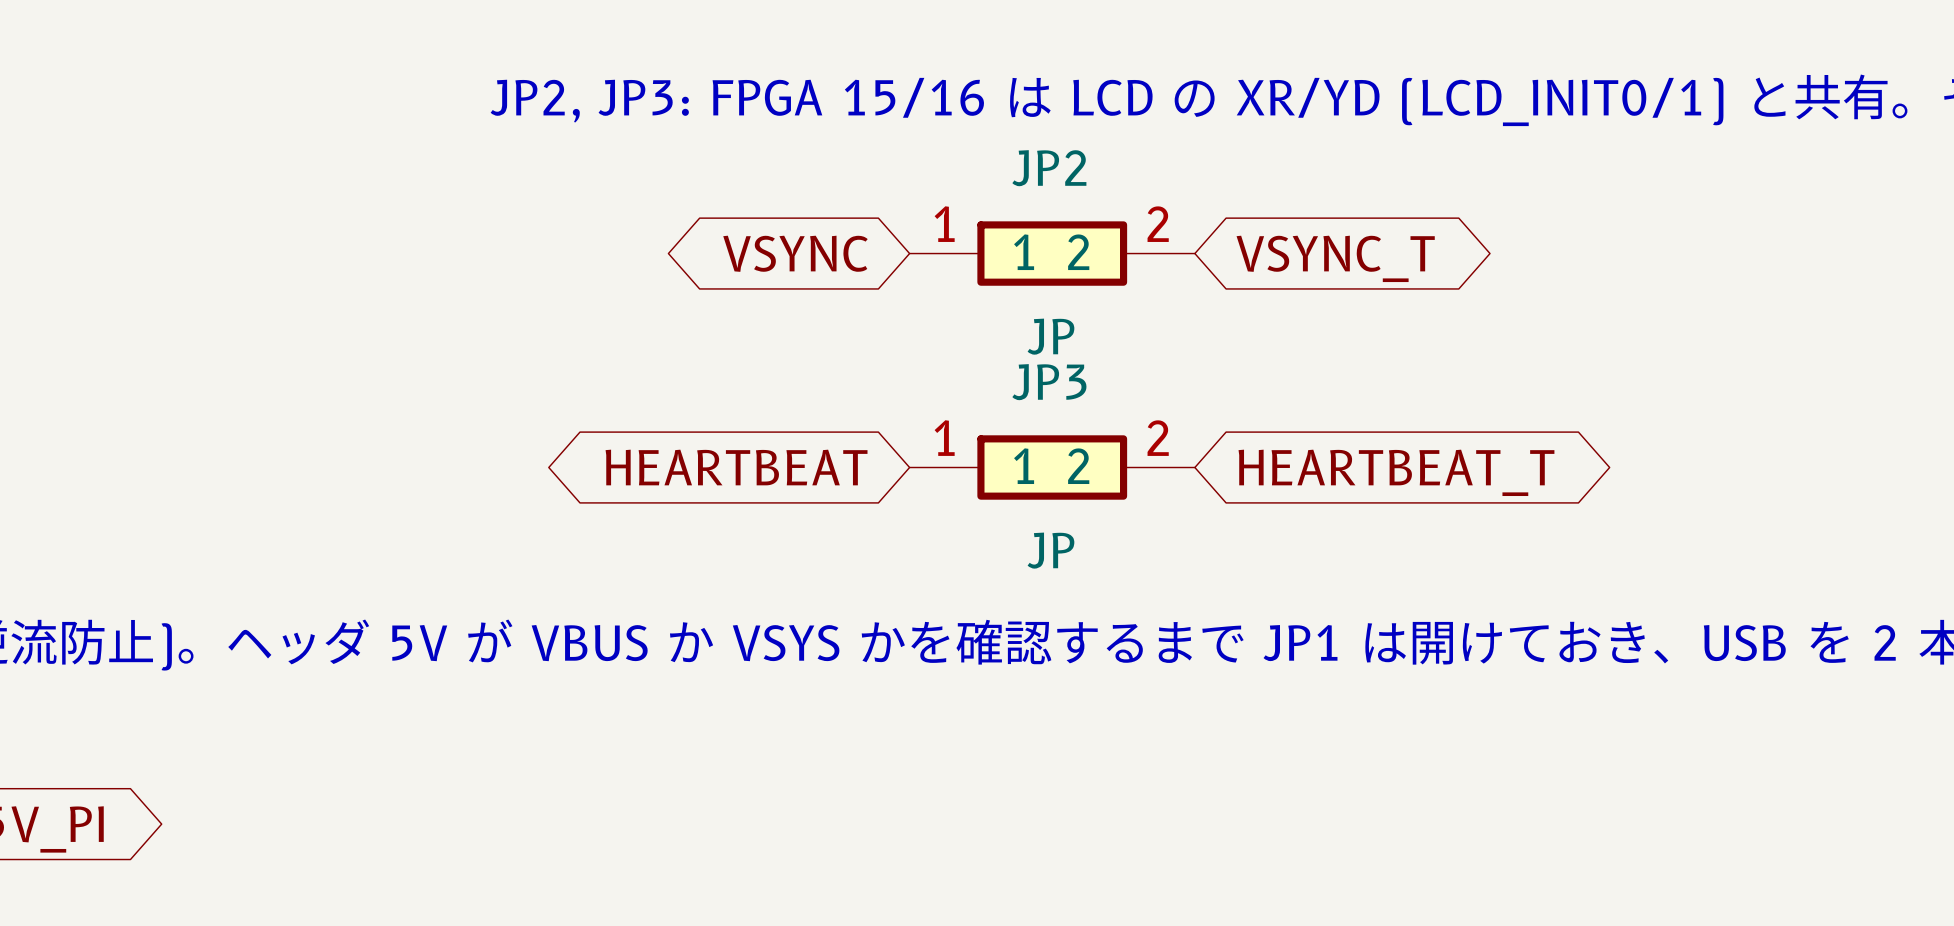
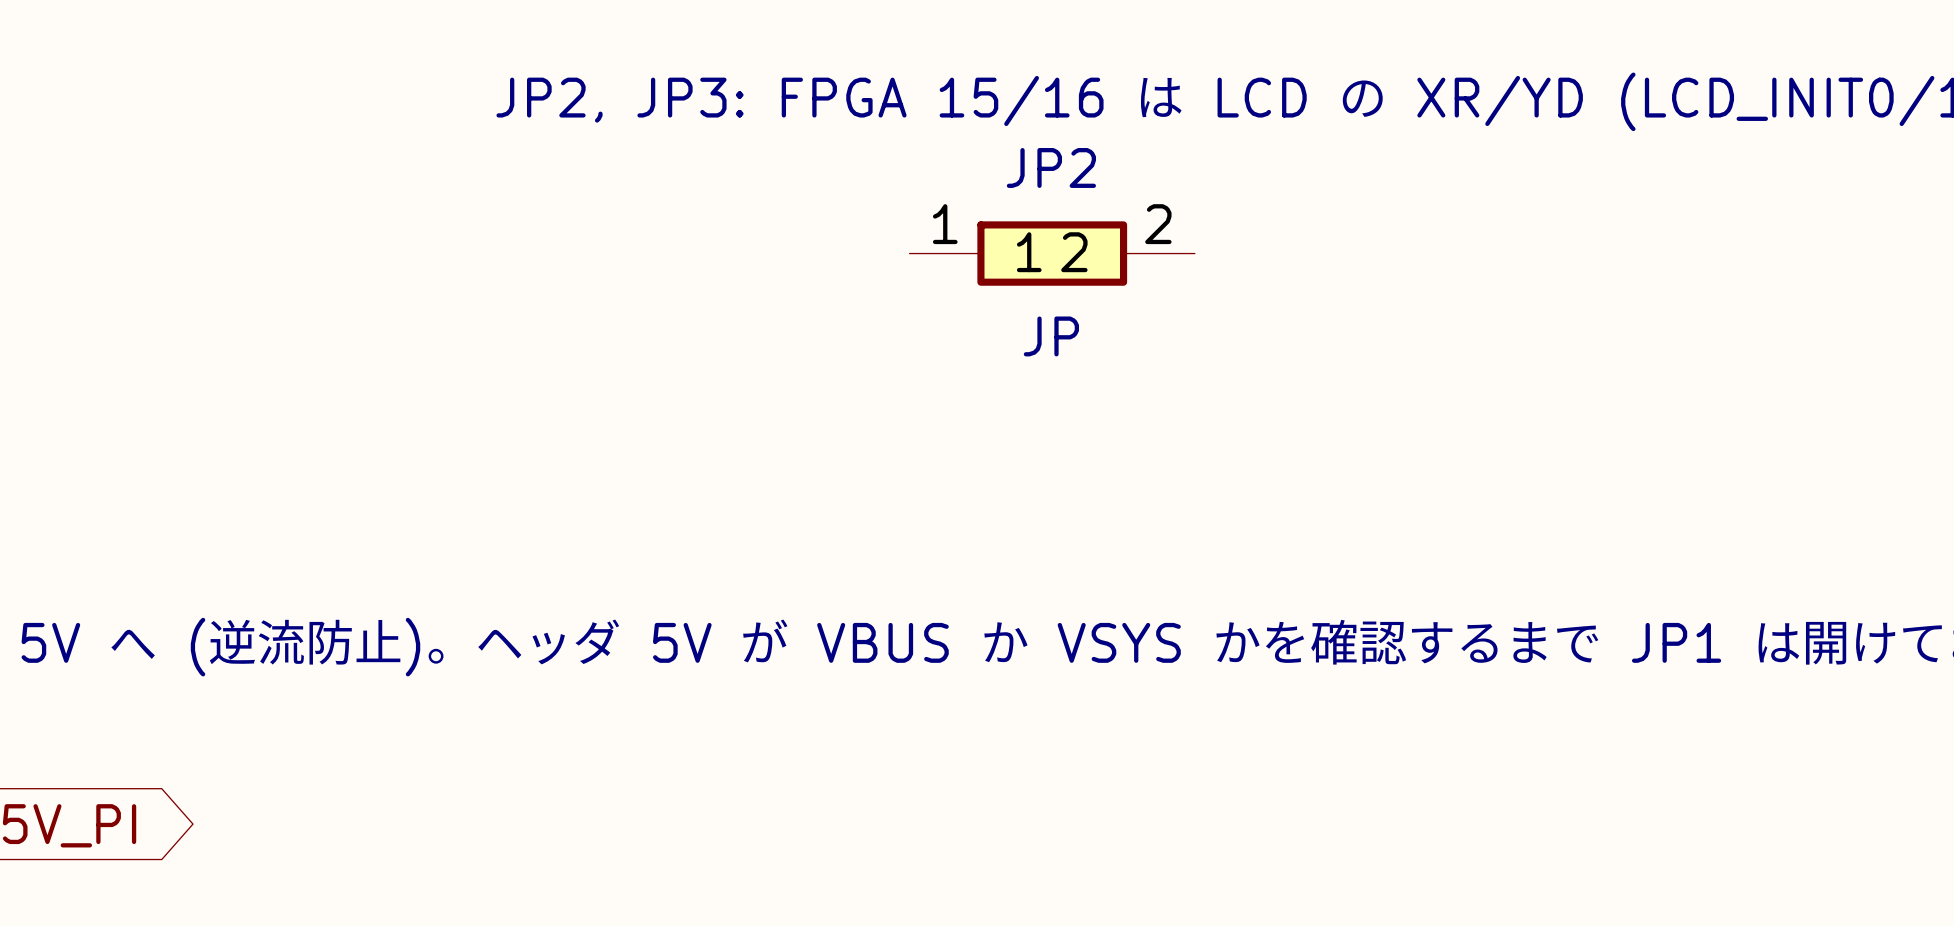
global label: VSYNC (795, 253) -> none
global label: VSYNC_T (1335, 258) -> none
global label: HEARTBEAT (736, 467) -> none
JP3: JP (1052, 467) -> none
global label: HEARTBEAT_T (1396, 472) -> none

